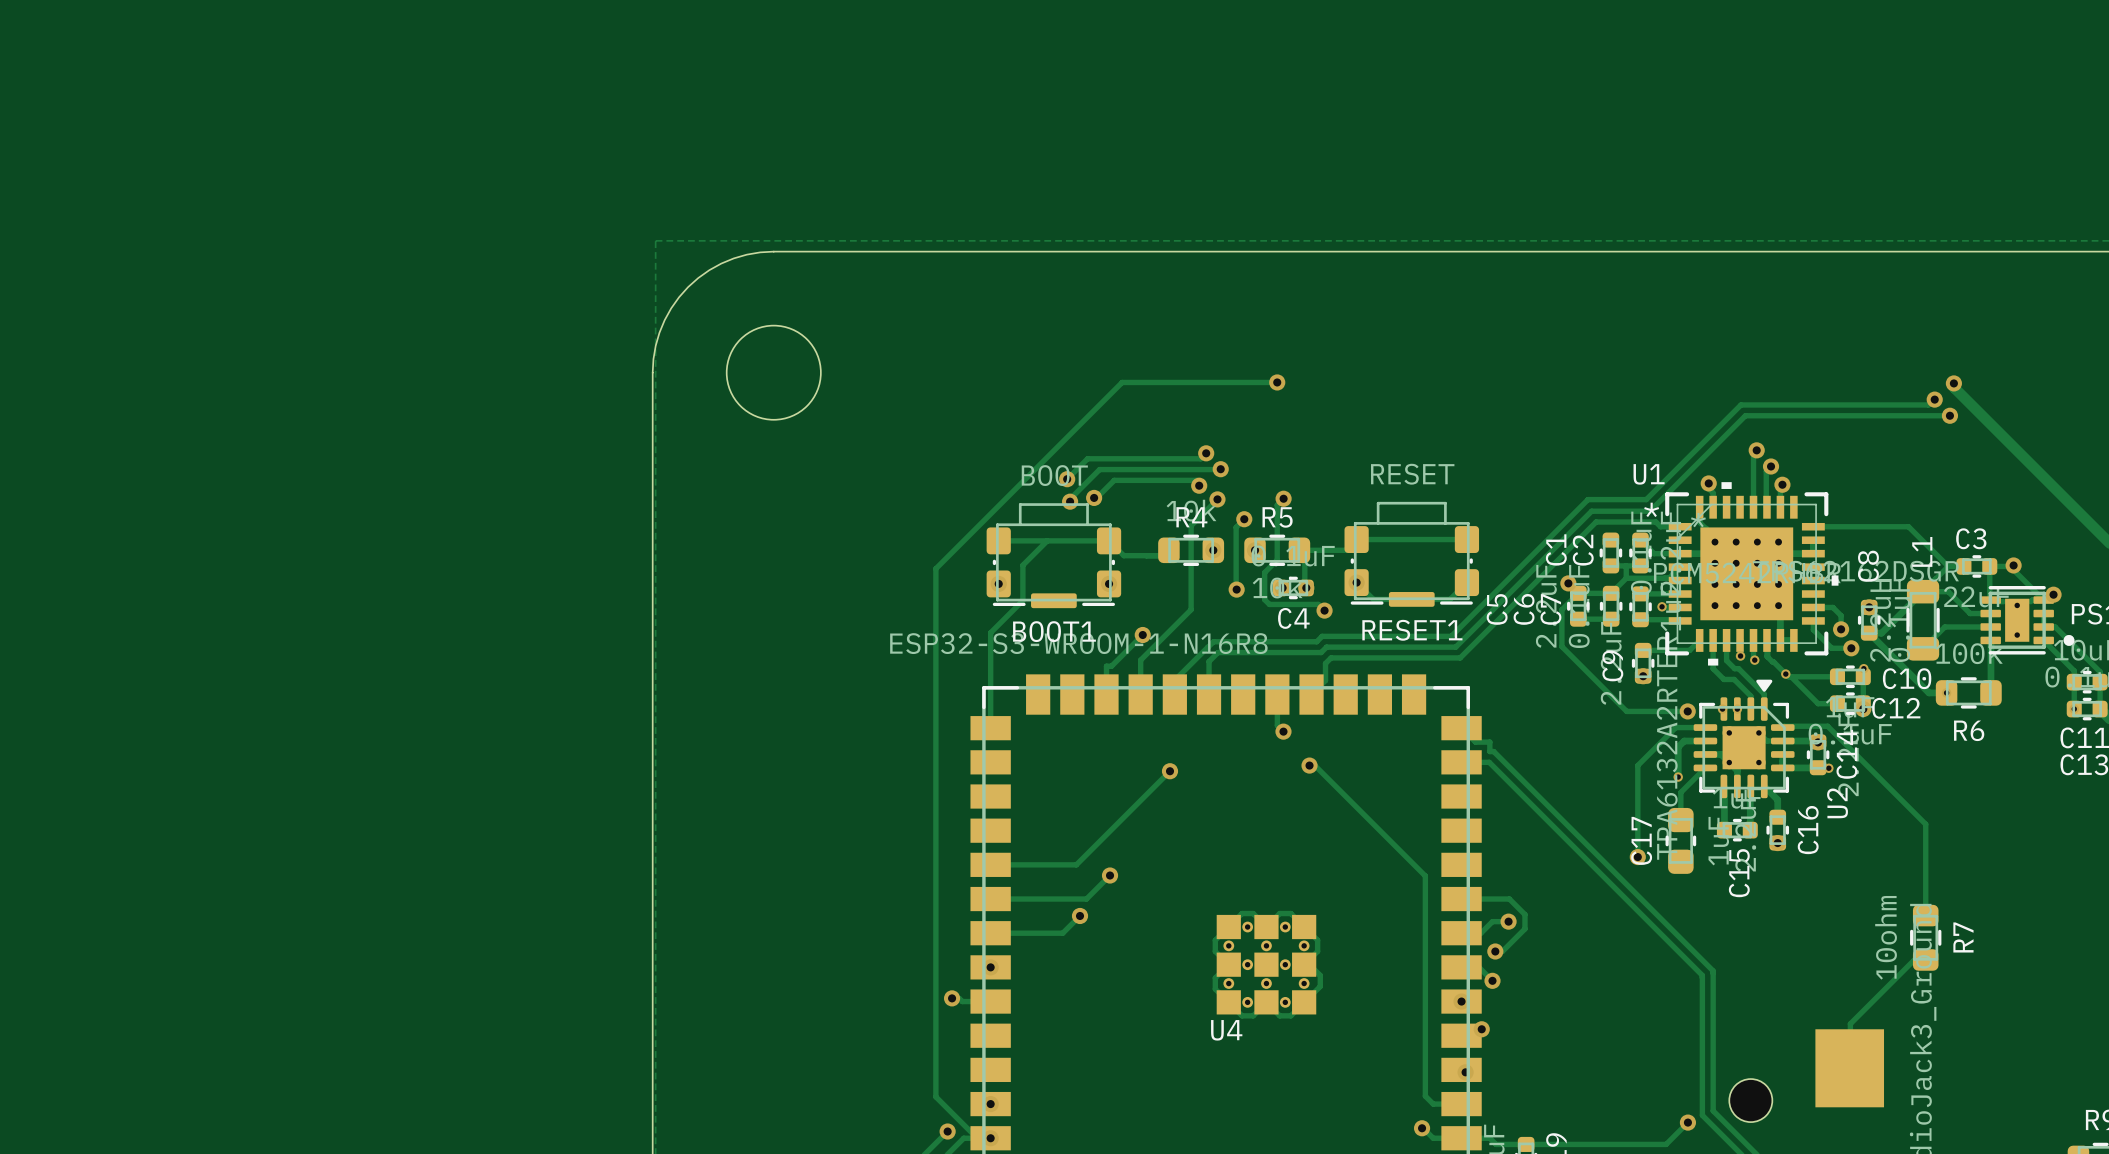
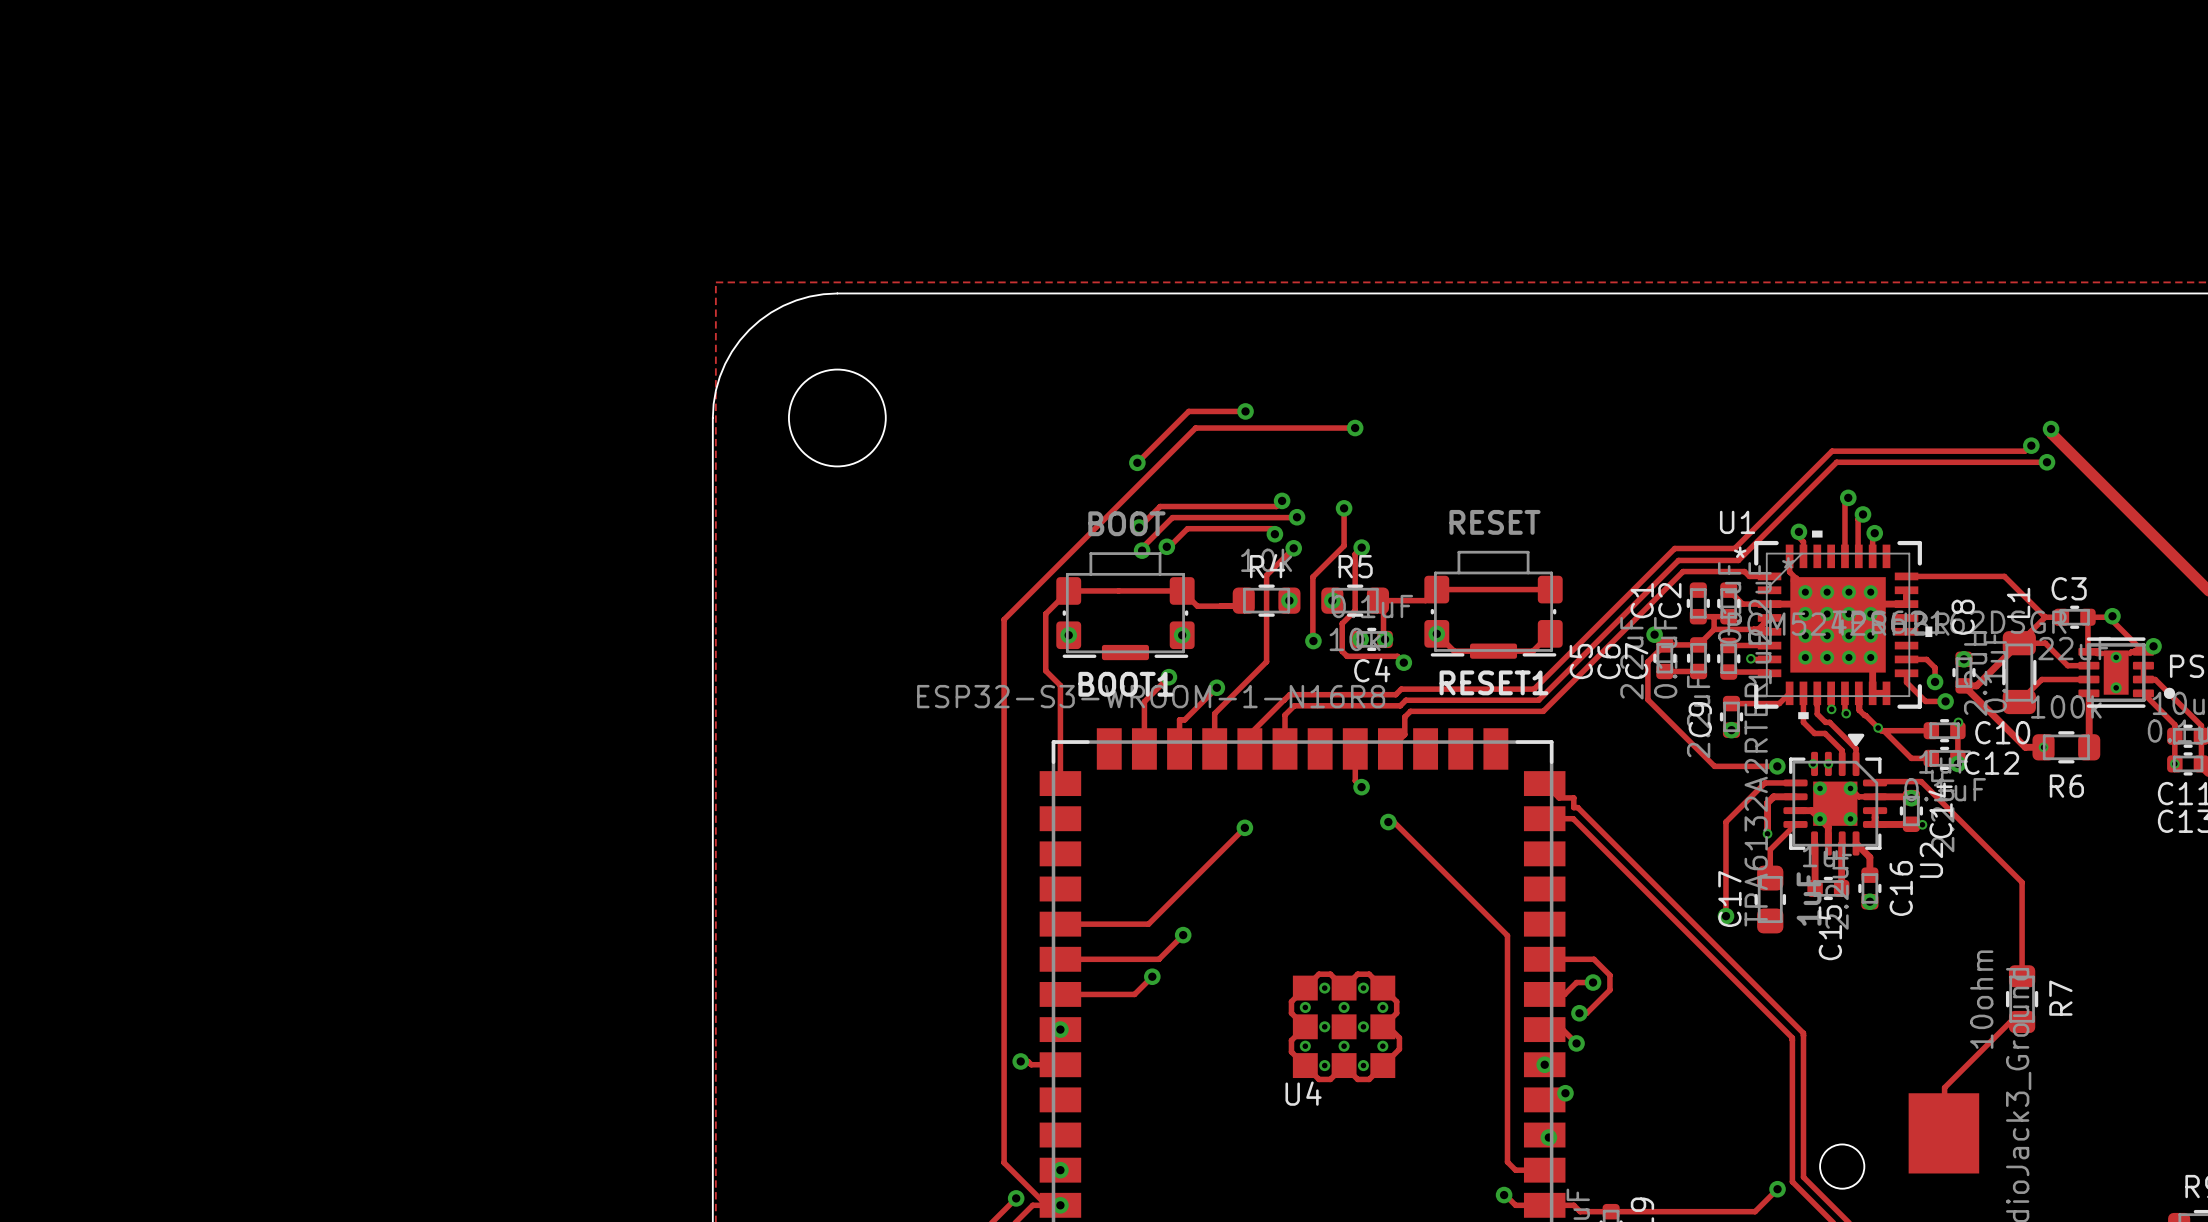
track: none -> (1245, 411) (1188, 411) (1137, 462)
via: none -> (1245, 411)
via: none -> (1137, 462)
track: none -> (1344, 508) (1344, 545) (1321, 568)
via position: (1244, 519) -> (1344, 508)
track: (1047, 540) (1022, 565) (1022, 600) (990, 632) -> (1068, 590) (1045, 613) (1045, 670) (1060, 685)
track: none -> (1168, 677) (1144, 701) (1144, 748)
via: none -> (1168, 677)

